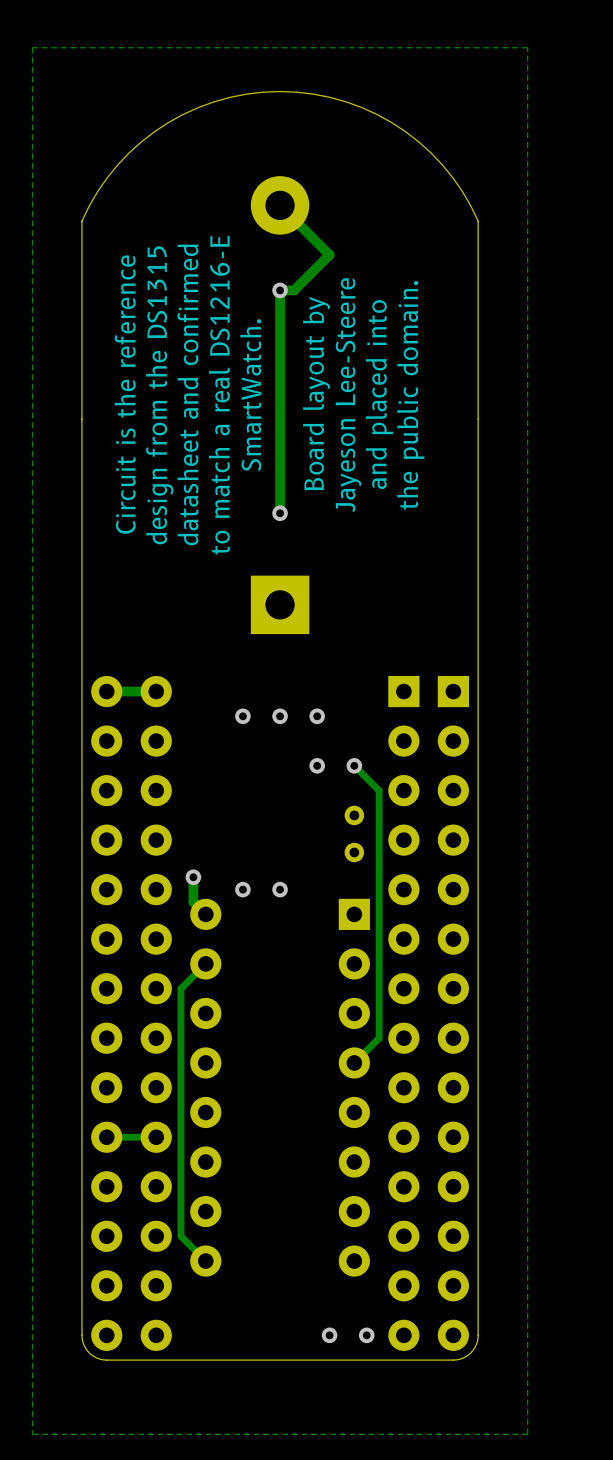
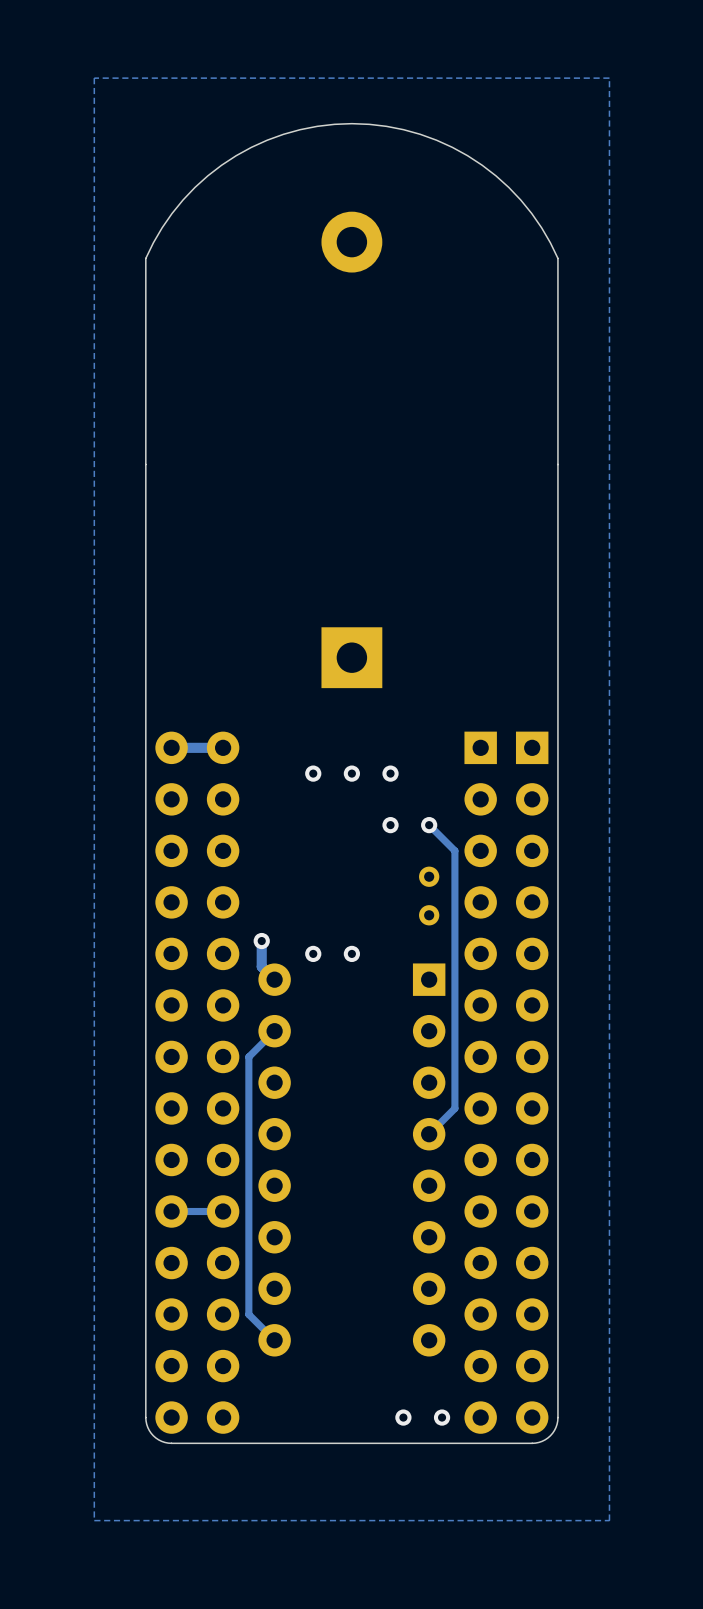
track: (280, 205) (329, 254) (294, 290) (280, 290) (280, 513) -> none
via: (280, 290) -> none
text: Board layout by (316, 393) -> none
text: Circuit is the reference (125, 394) -> none
text: datasheet and confirmed (187, 394) -> none
text: and placed into (379, 394) -> none
text: design from the DS1315 (159, 395) -> none
text: to match a real DS1216-E (219, 395) -> none
text: SmartWatch. (250, 395) -> none
text: Jayeson Lee-Steere (348, 395) -> none
text: the public domain. (410, 395) -> none
via: (280, 513) -> none

